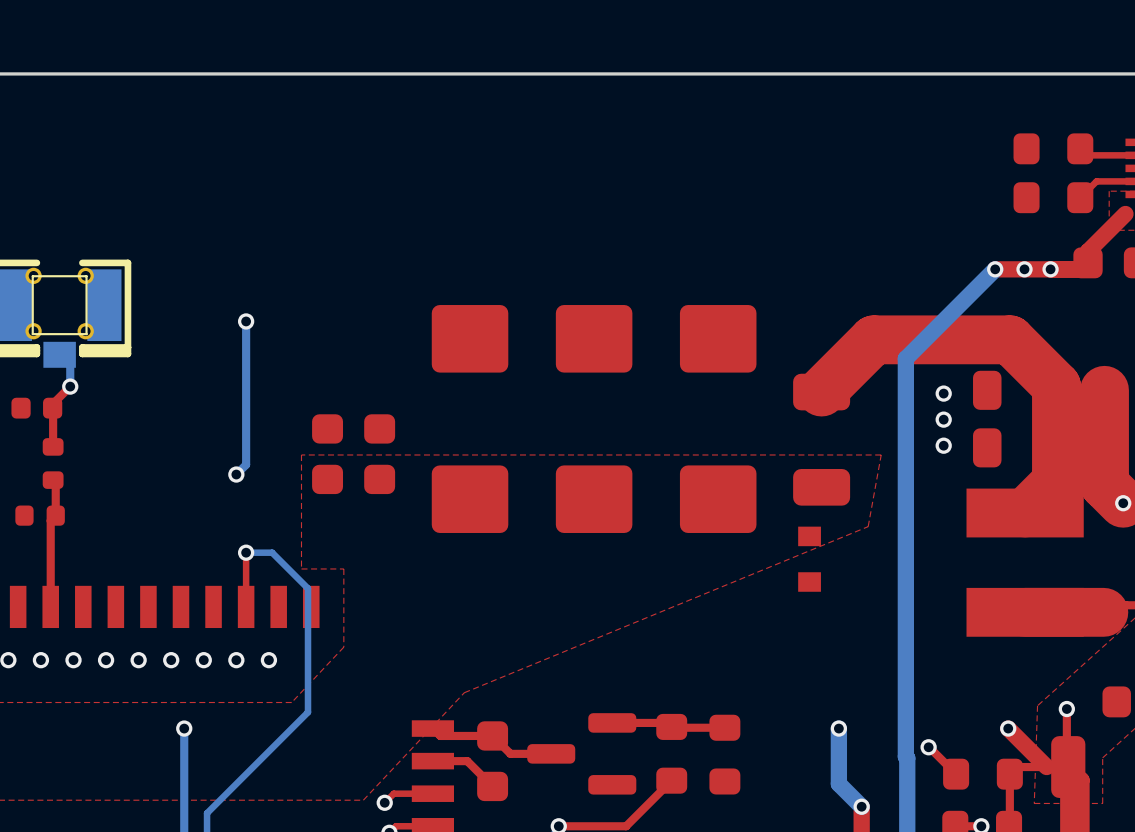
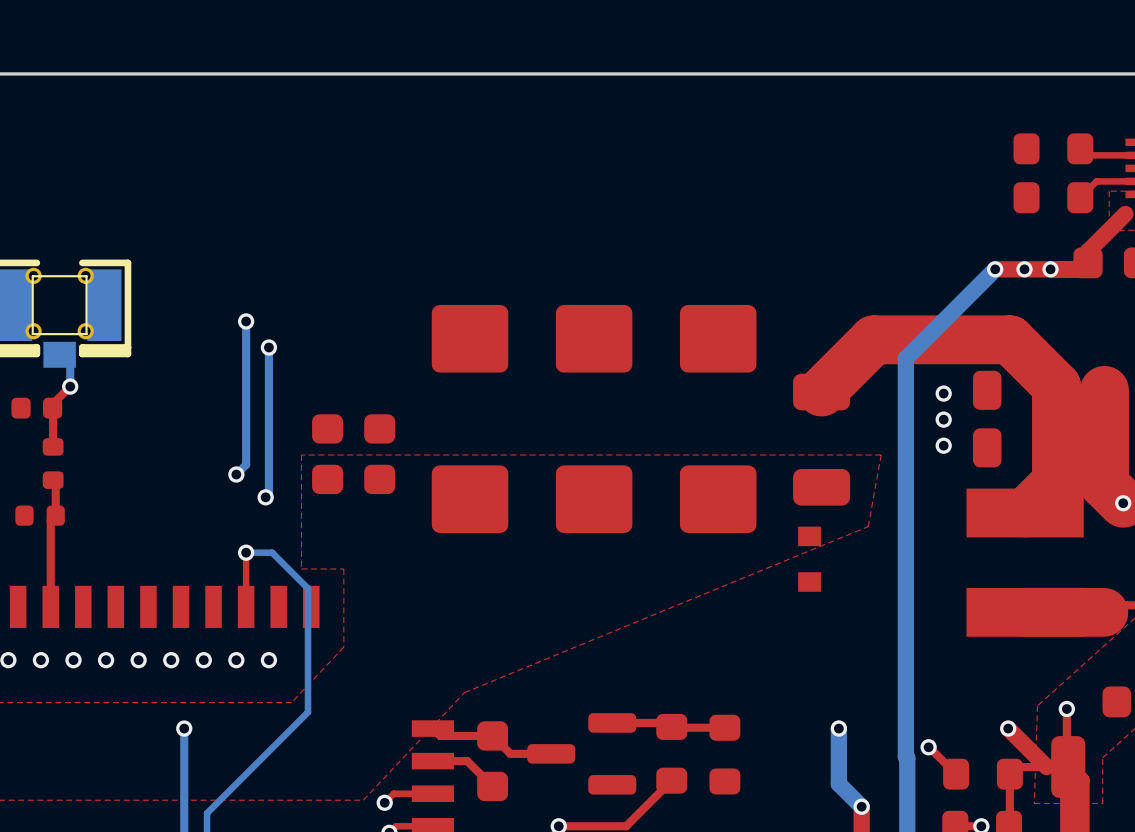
bottom track: none -> (268, 347) (268, 494) (265, 497)
via: none -> (268, 347)
via: none -> (265, 497)

